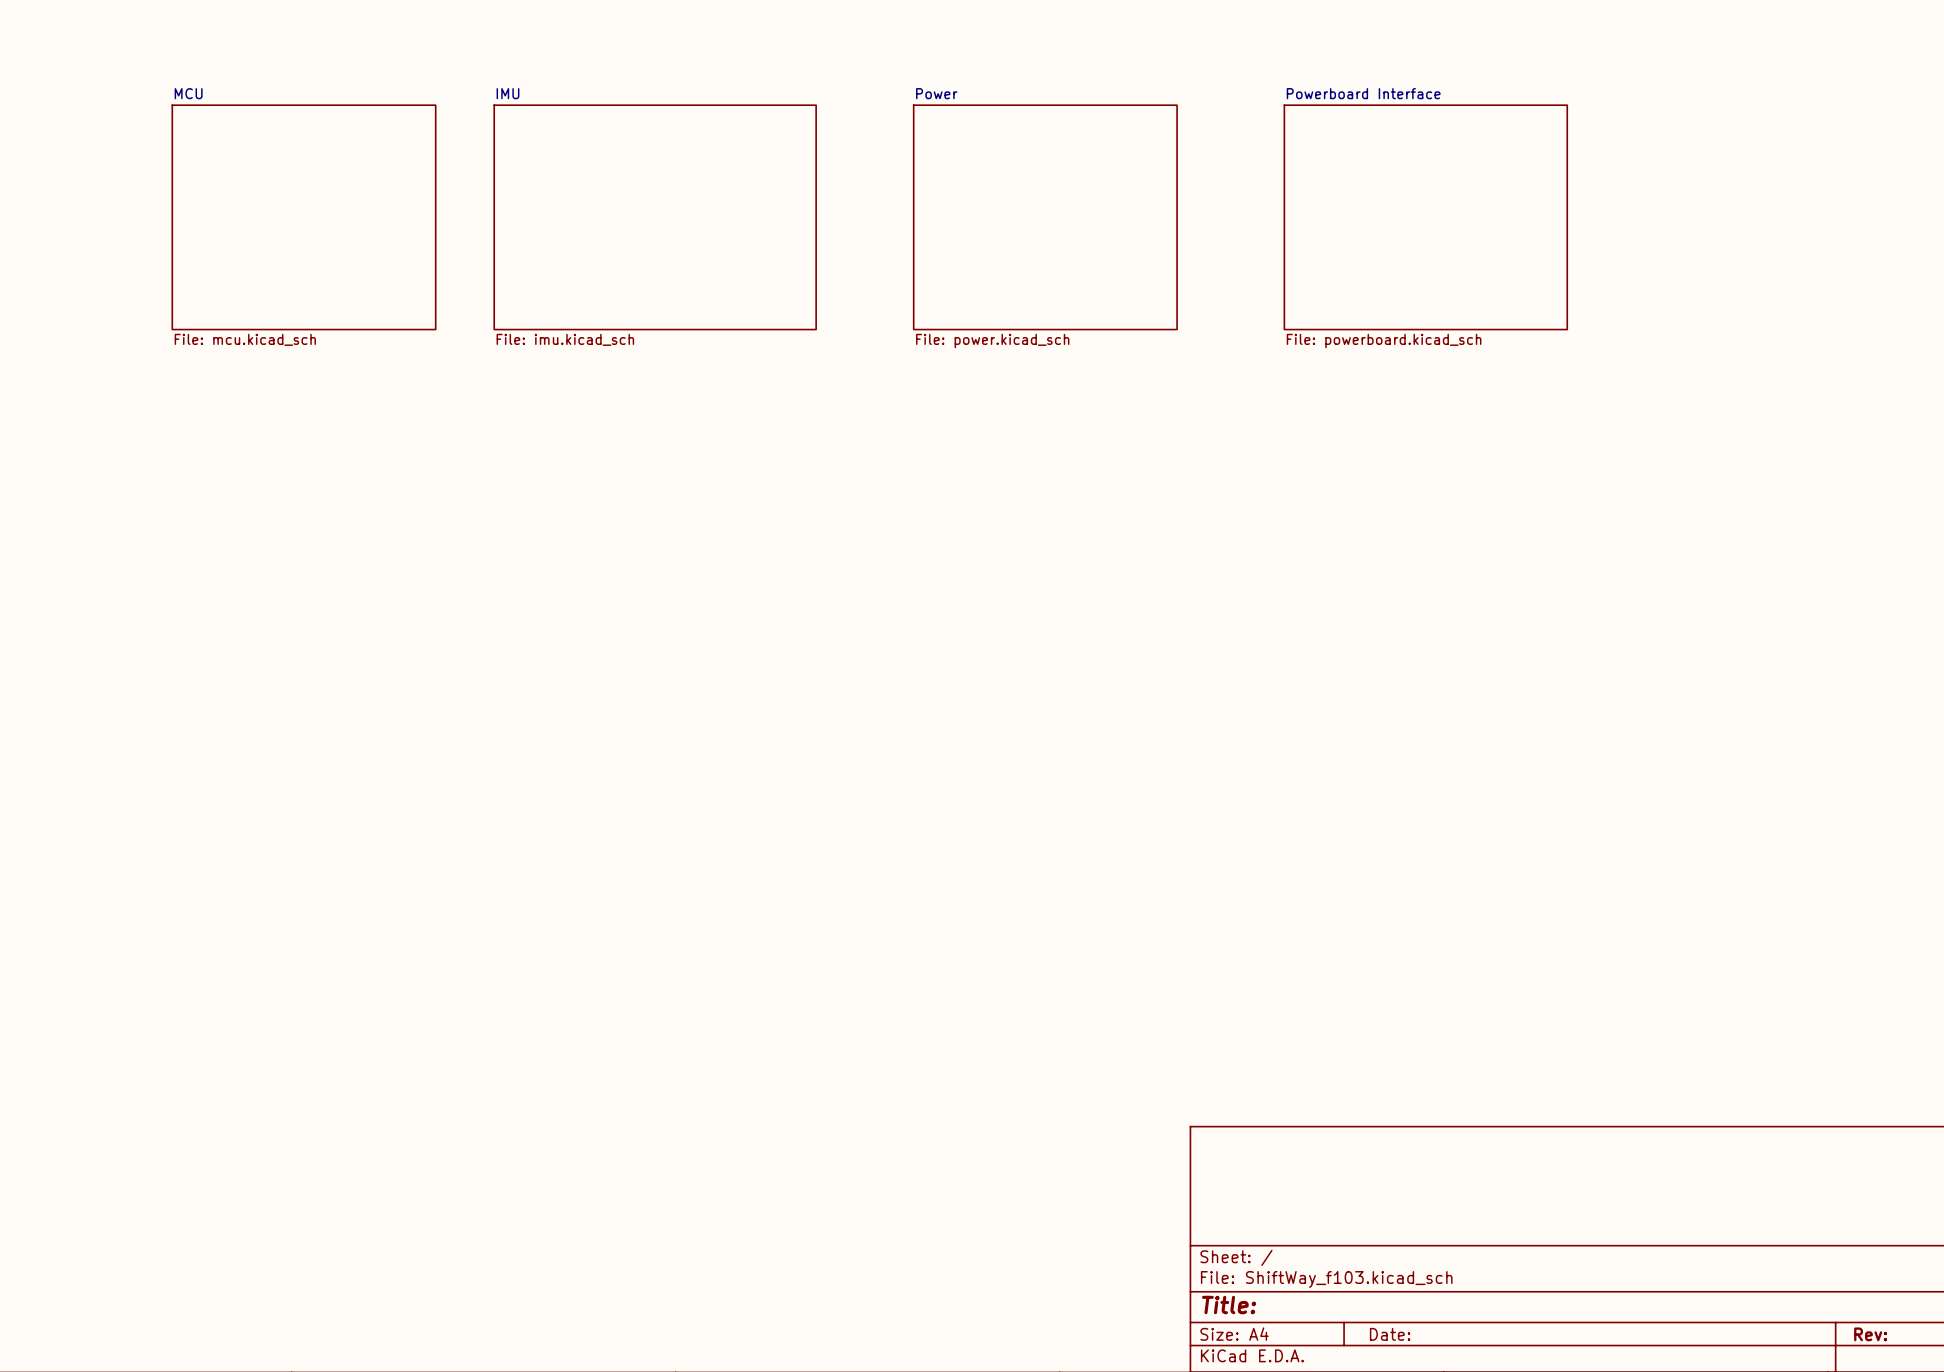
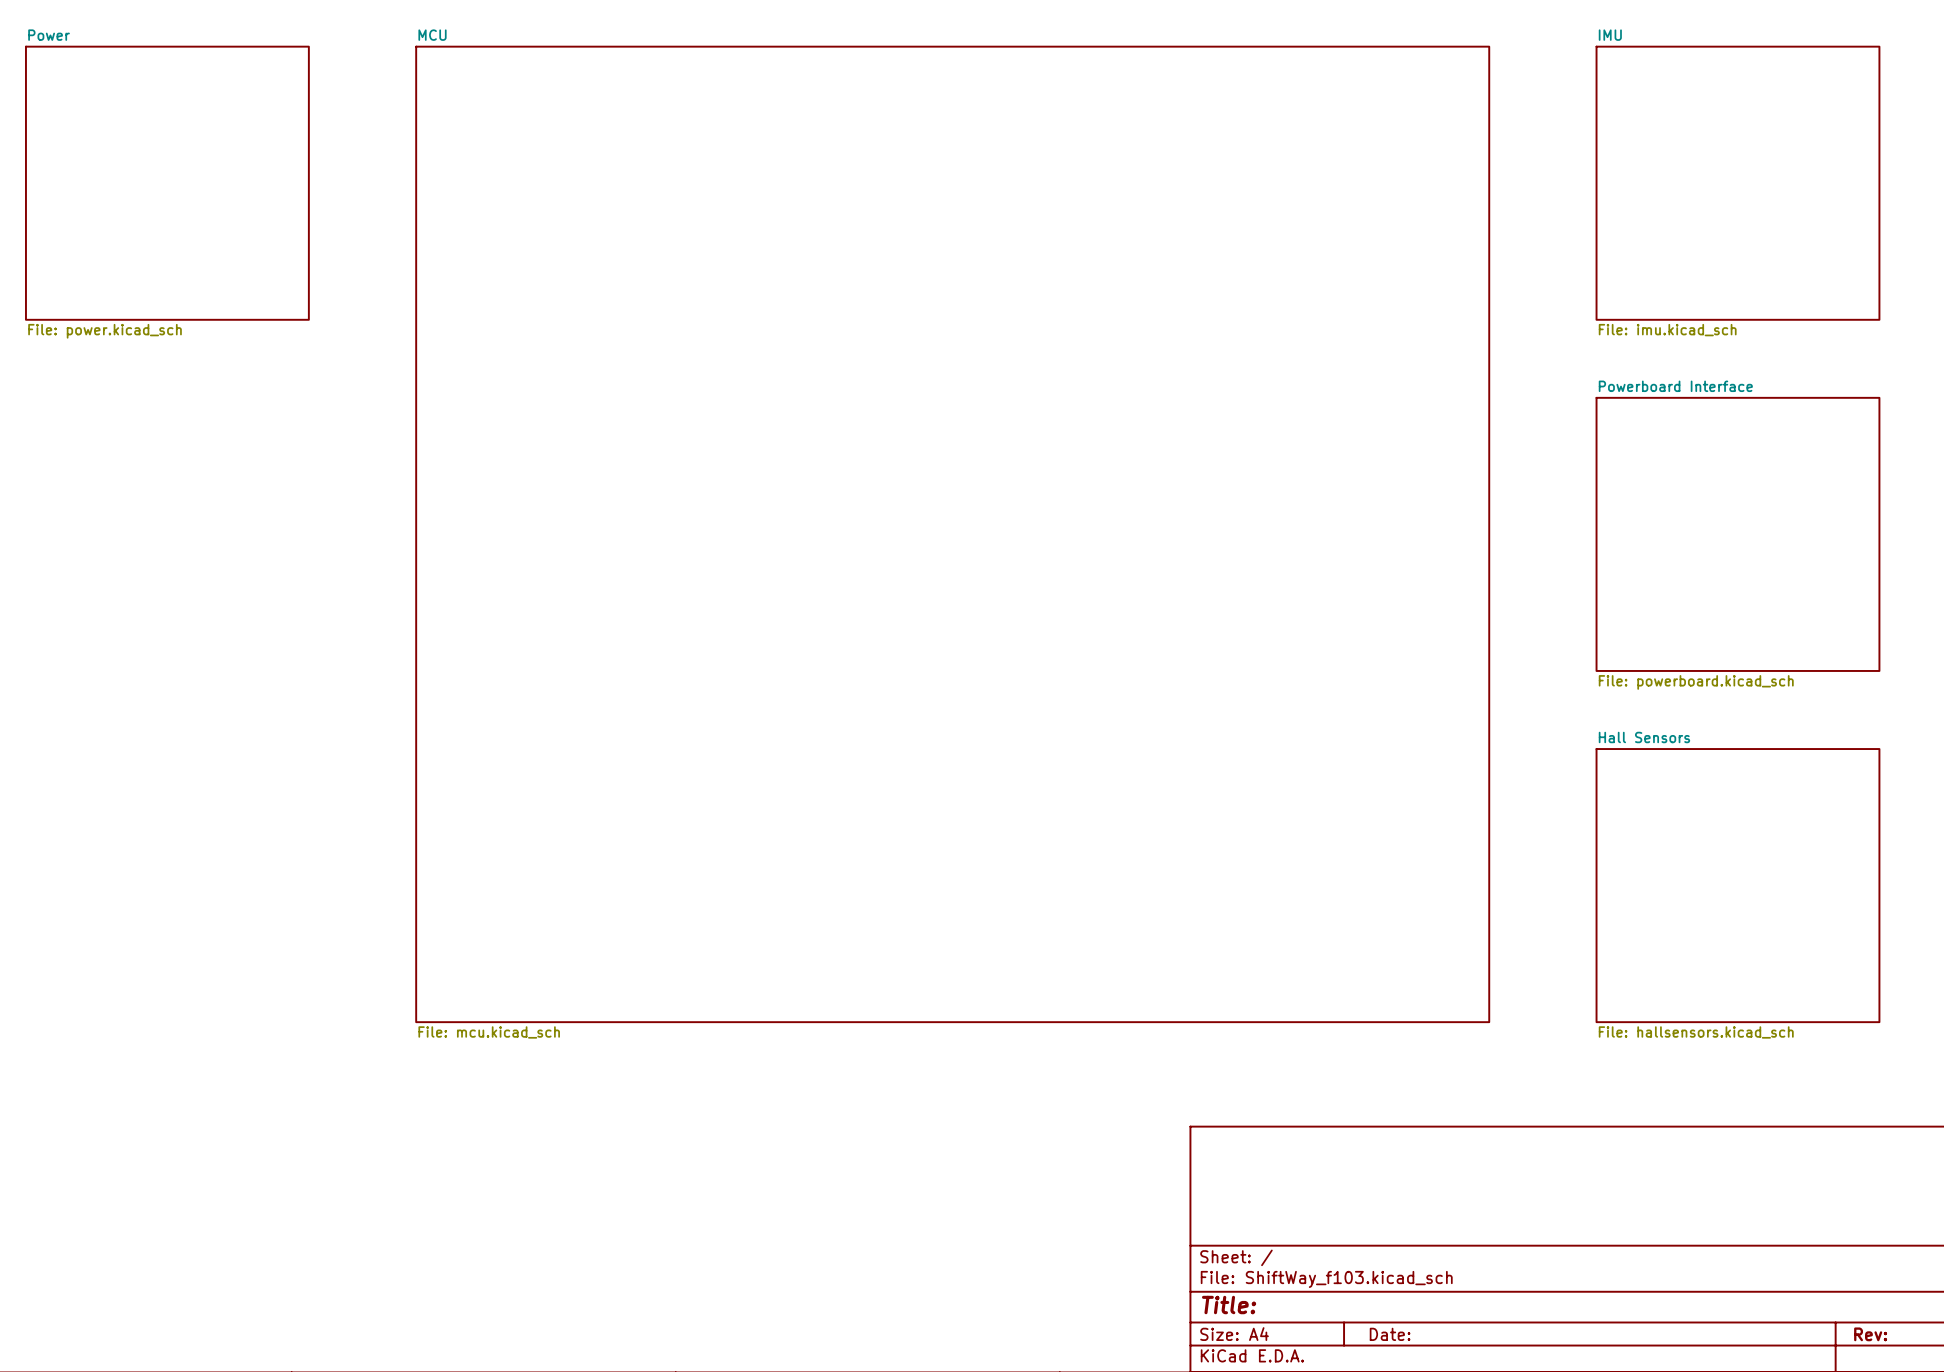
sheet Power: none -> File: power.kicad_sch (167, 183)
sheet IMU: none -> File: imu.kicad_sch (1737, 183)
sheet MCU: File: mcu.kicad_sch (303, 217) -> none
sheet IMU: File: imu.kicad_sch (655, 217) -> none
sheet Power: File: power.kicad_sch (1045, 217) -> none
sheet Powerboard Interface: File: powerboard.kicad_sch (1425, 217) -> none
sheet MCU: none -> File: mcu.kicad_sch (952, 534)
sheet Powerboard Interface: none -> File: powerboard.kicad_sch (1737, 534)
sheet Hall Sensors: none -> File: hallsensors.kicad_sch (1737, 885)

